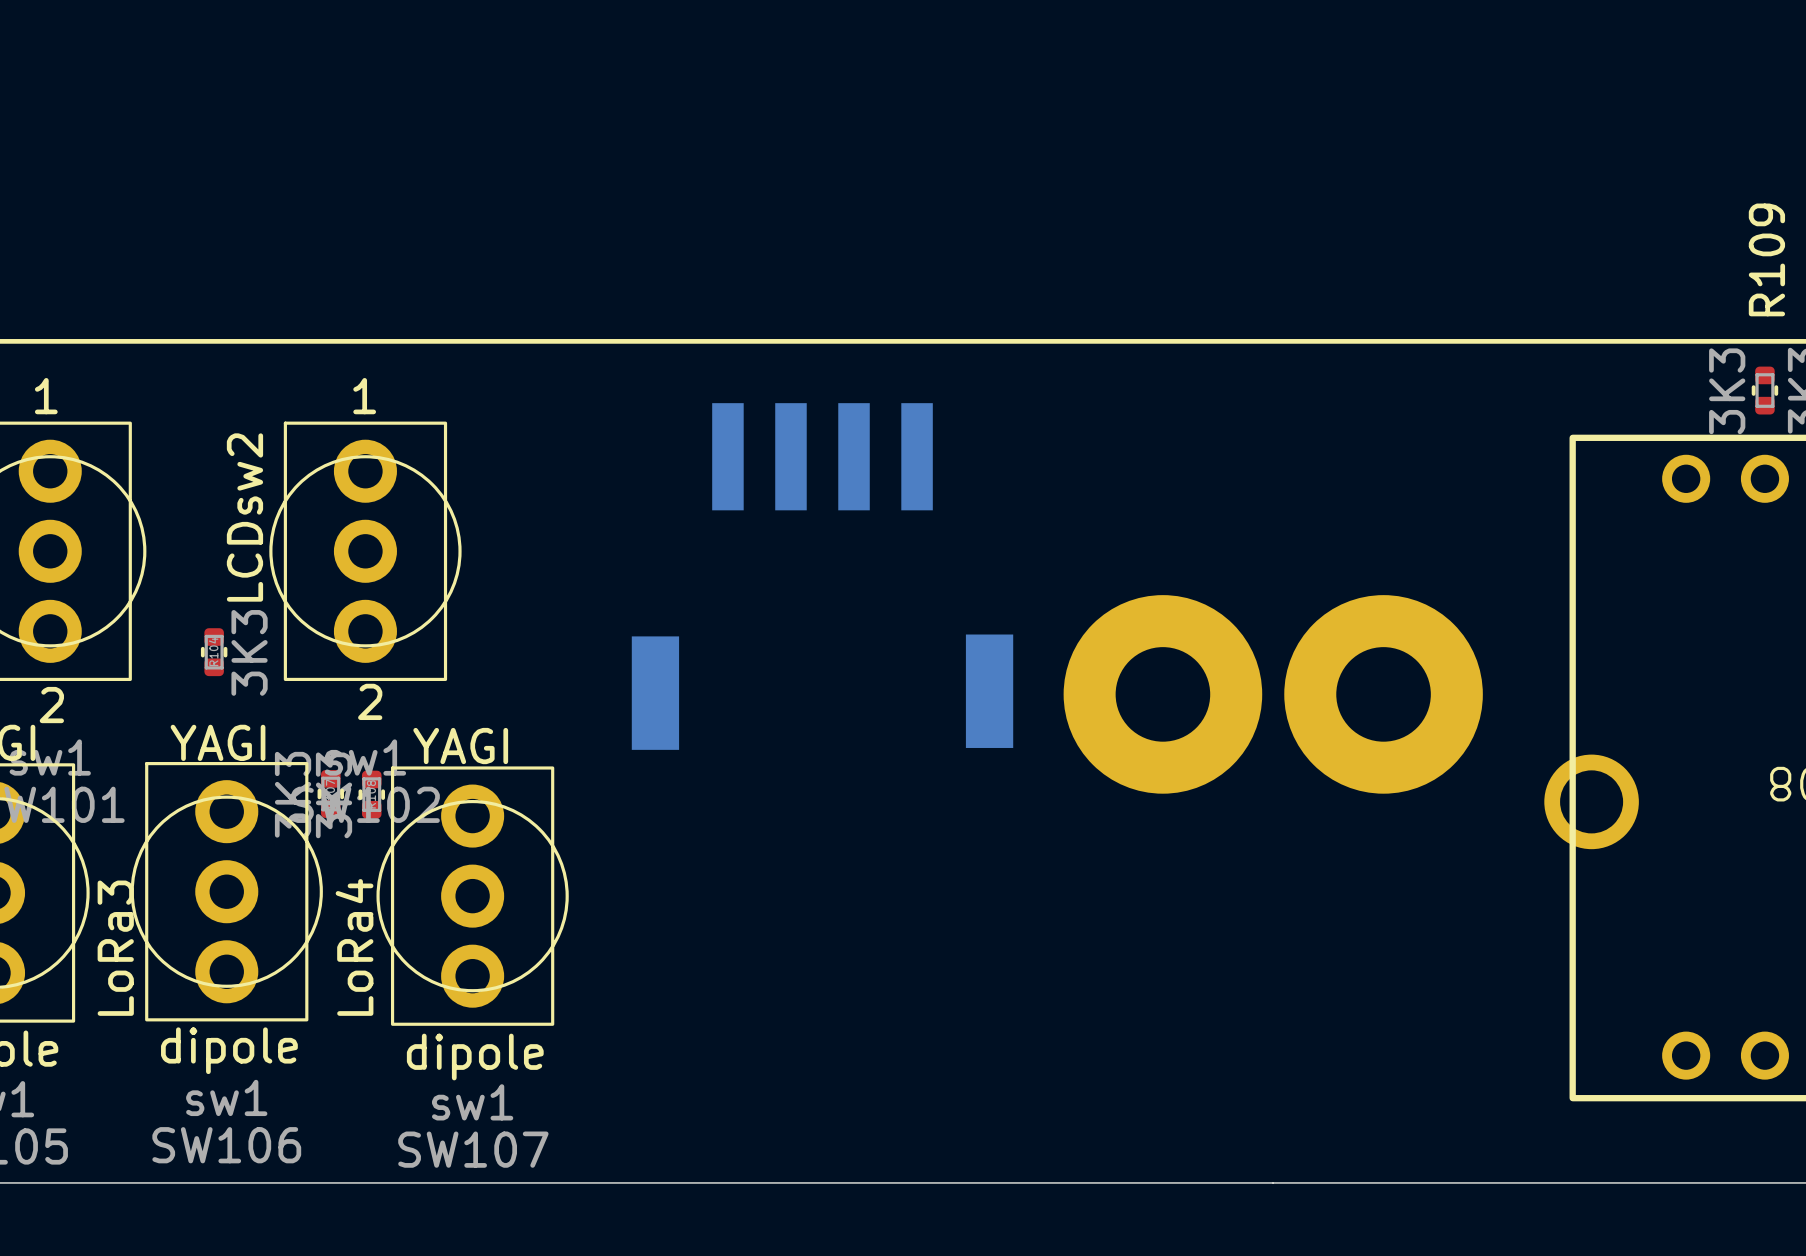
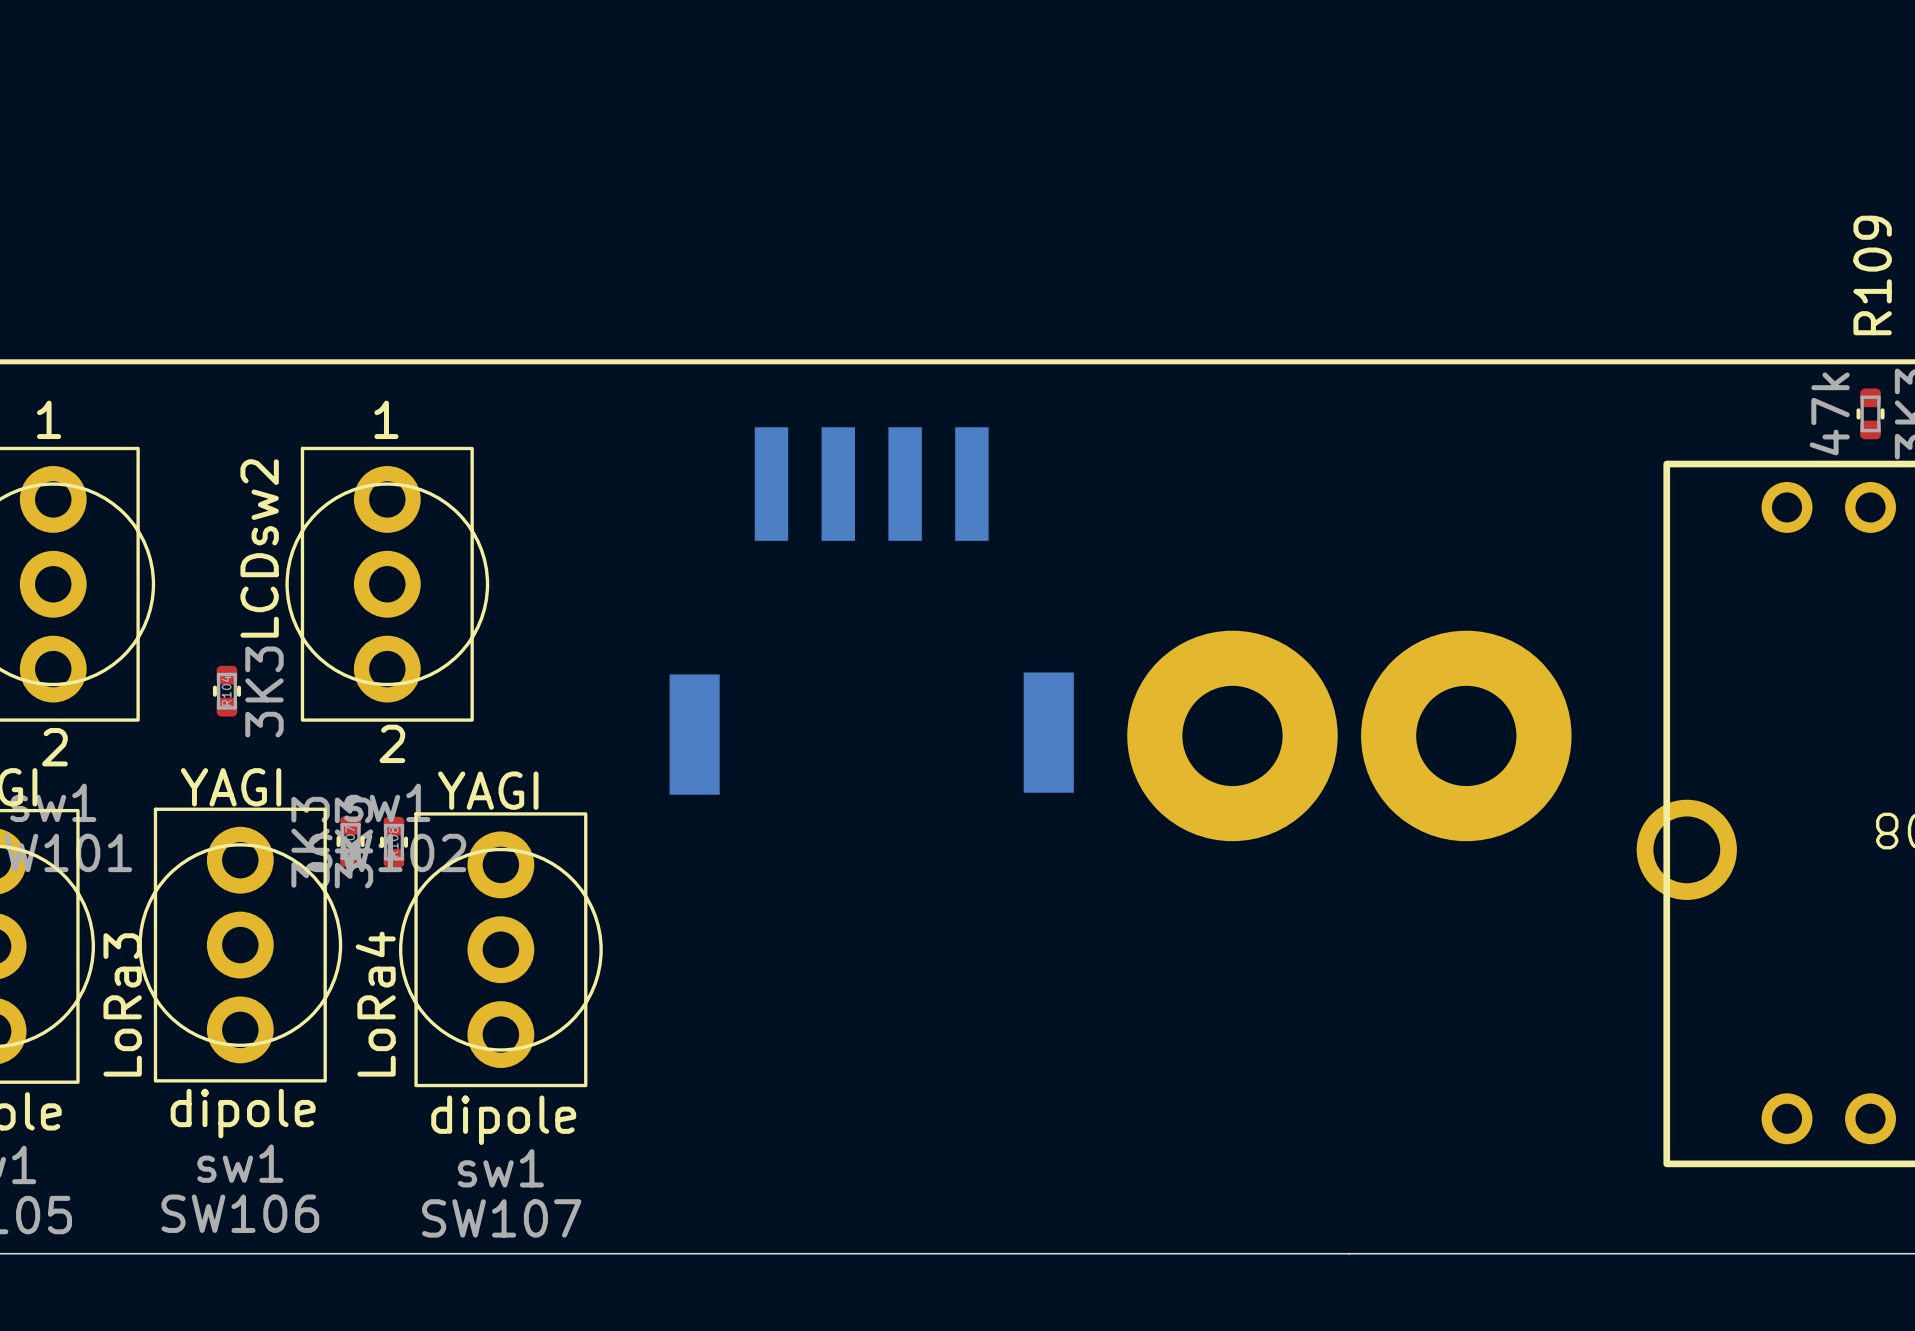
R109 value: 3K3 (1727, 391) -> 47k (1829, 413)

